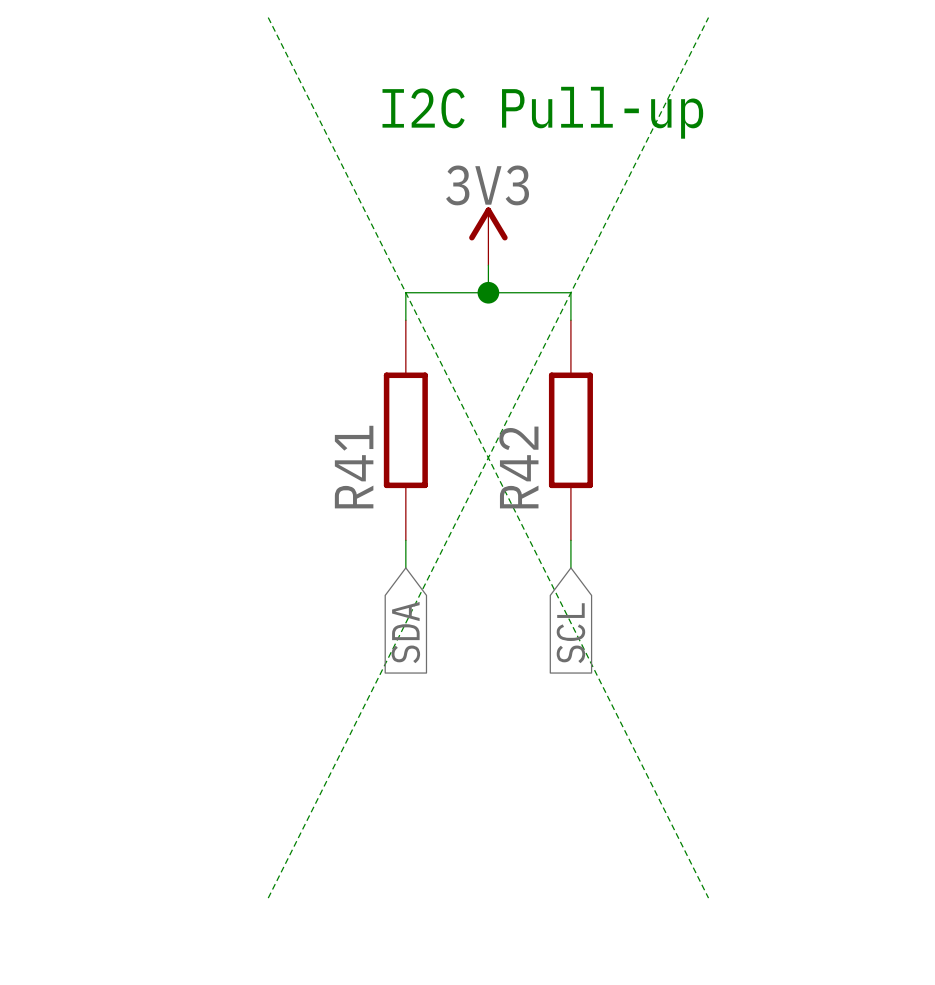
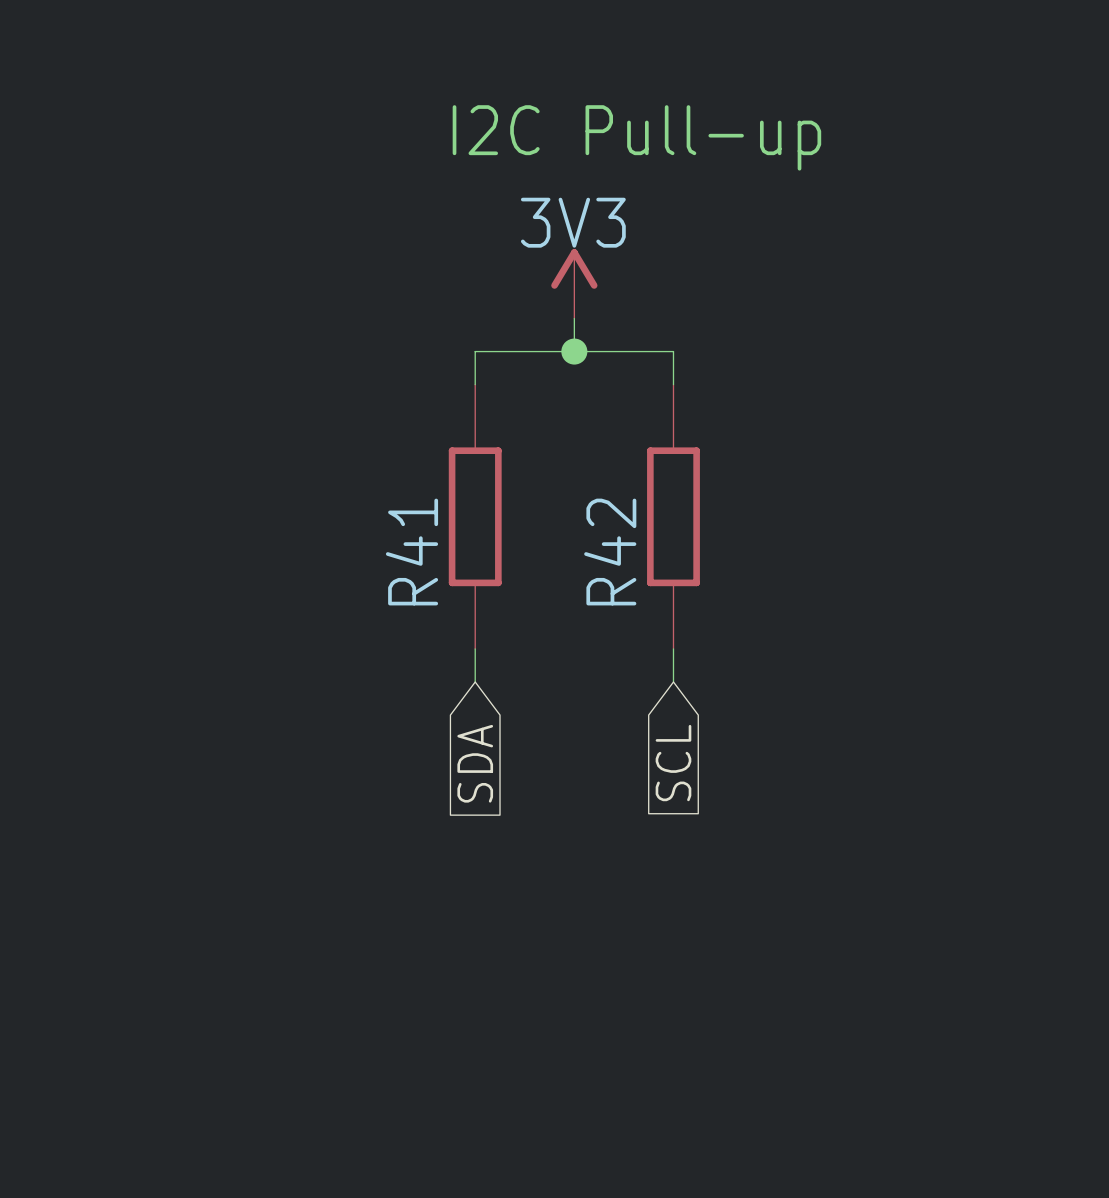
wire: (268, 17) (708, 898) -> none
wire: (708, 17) (268, 898) -> none

